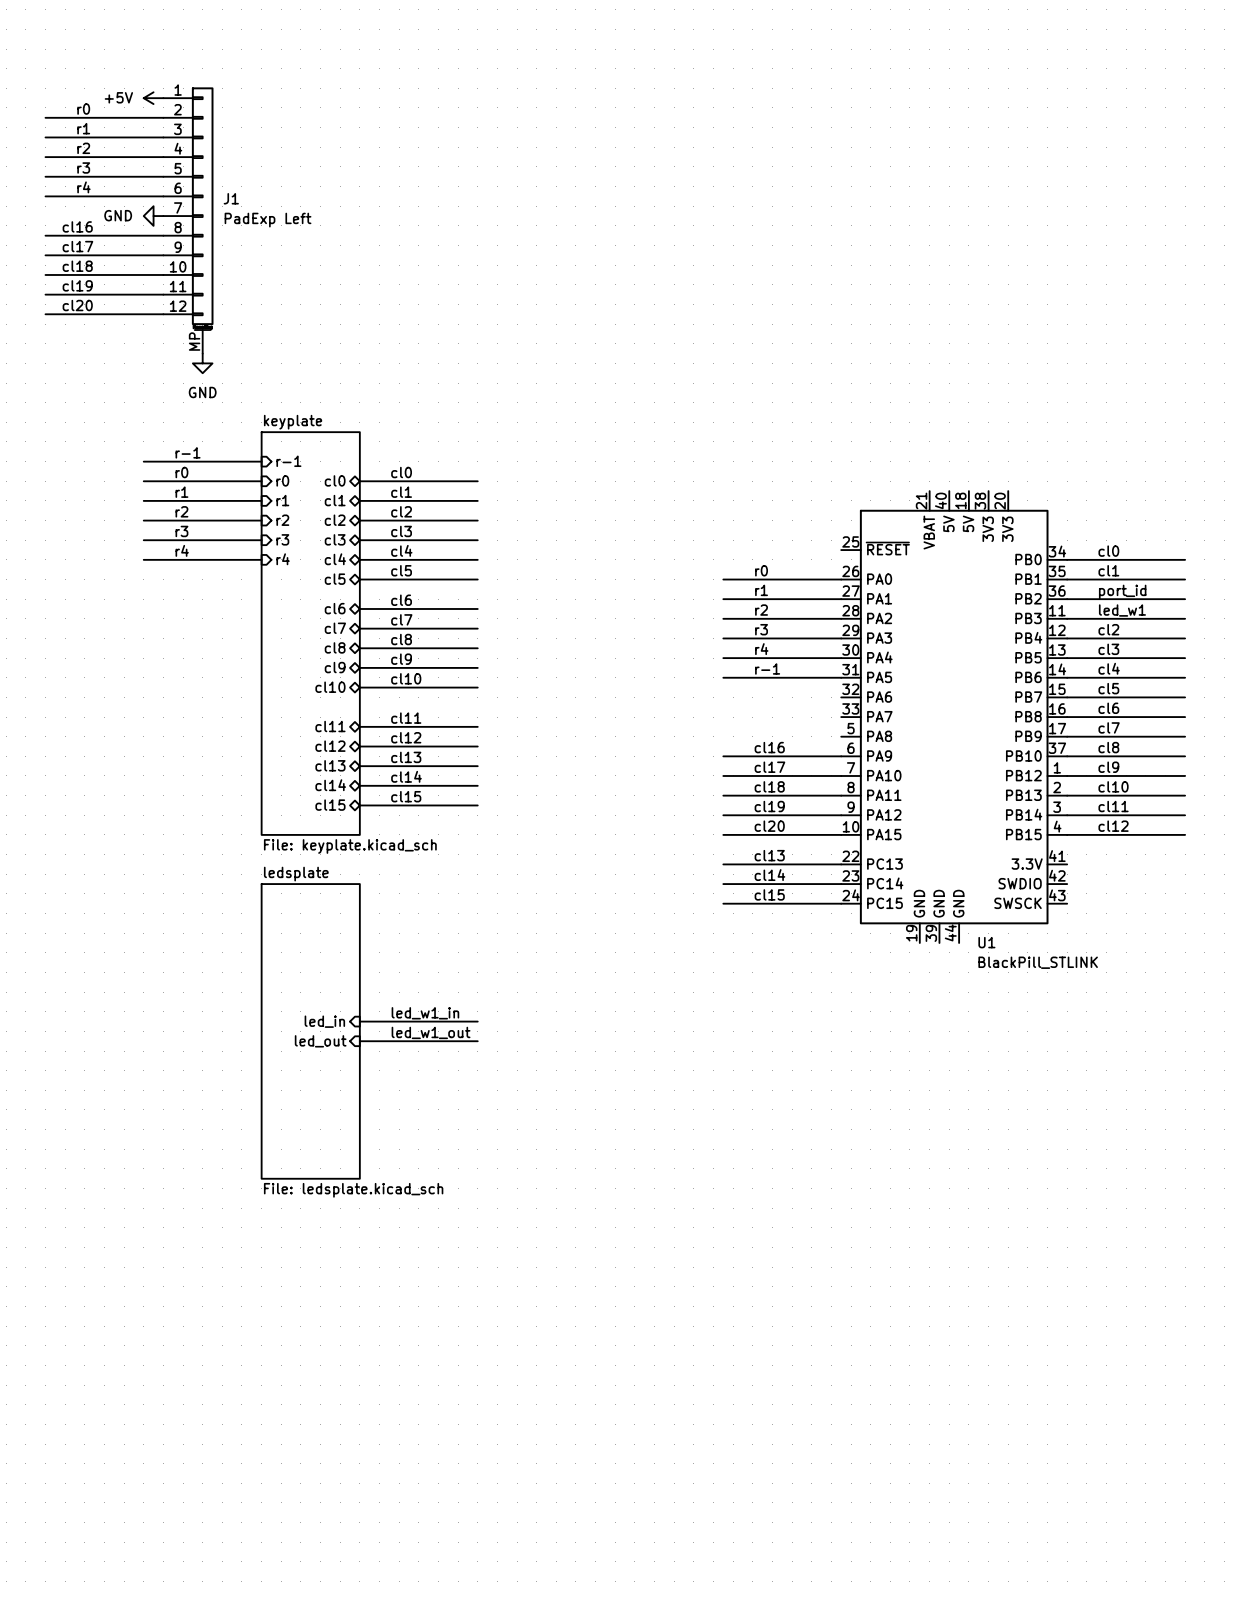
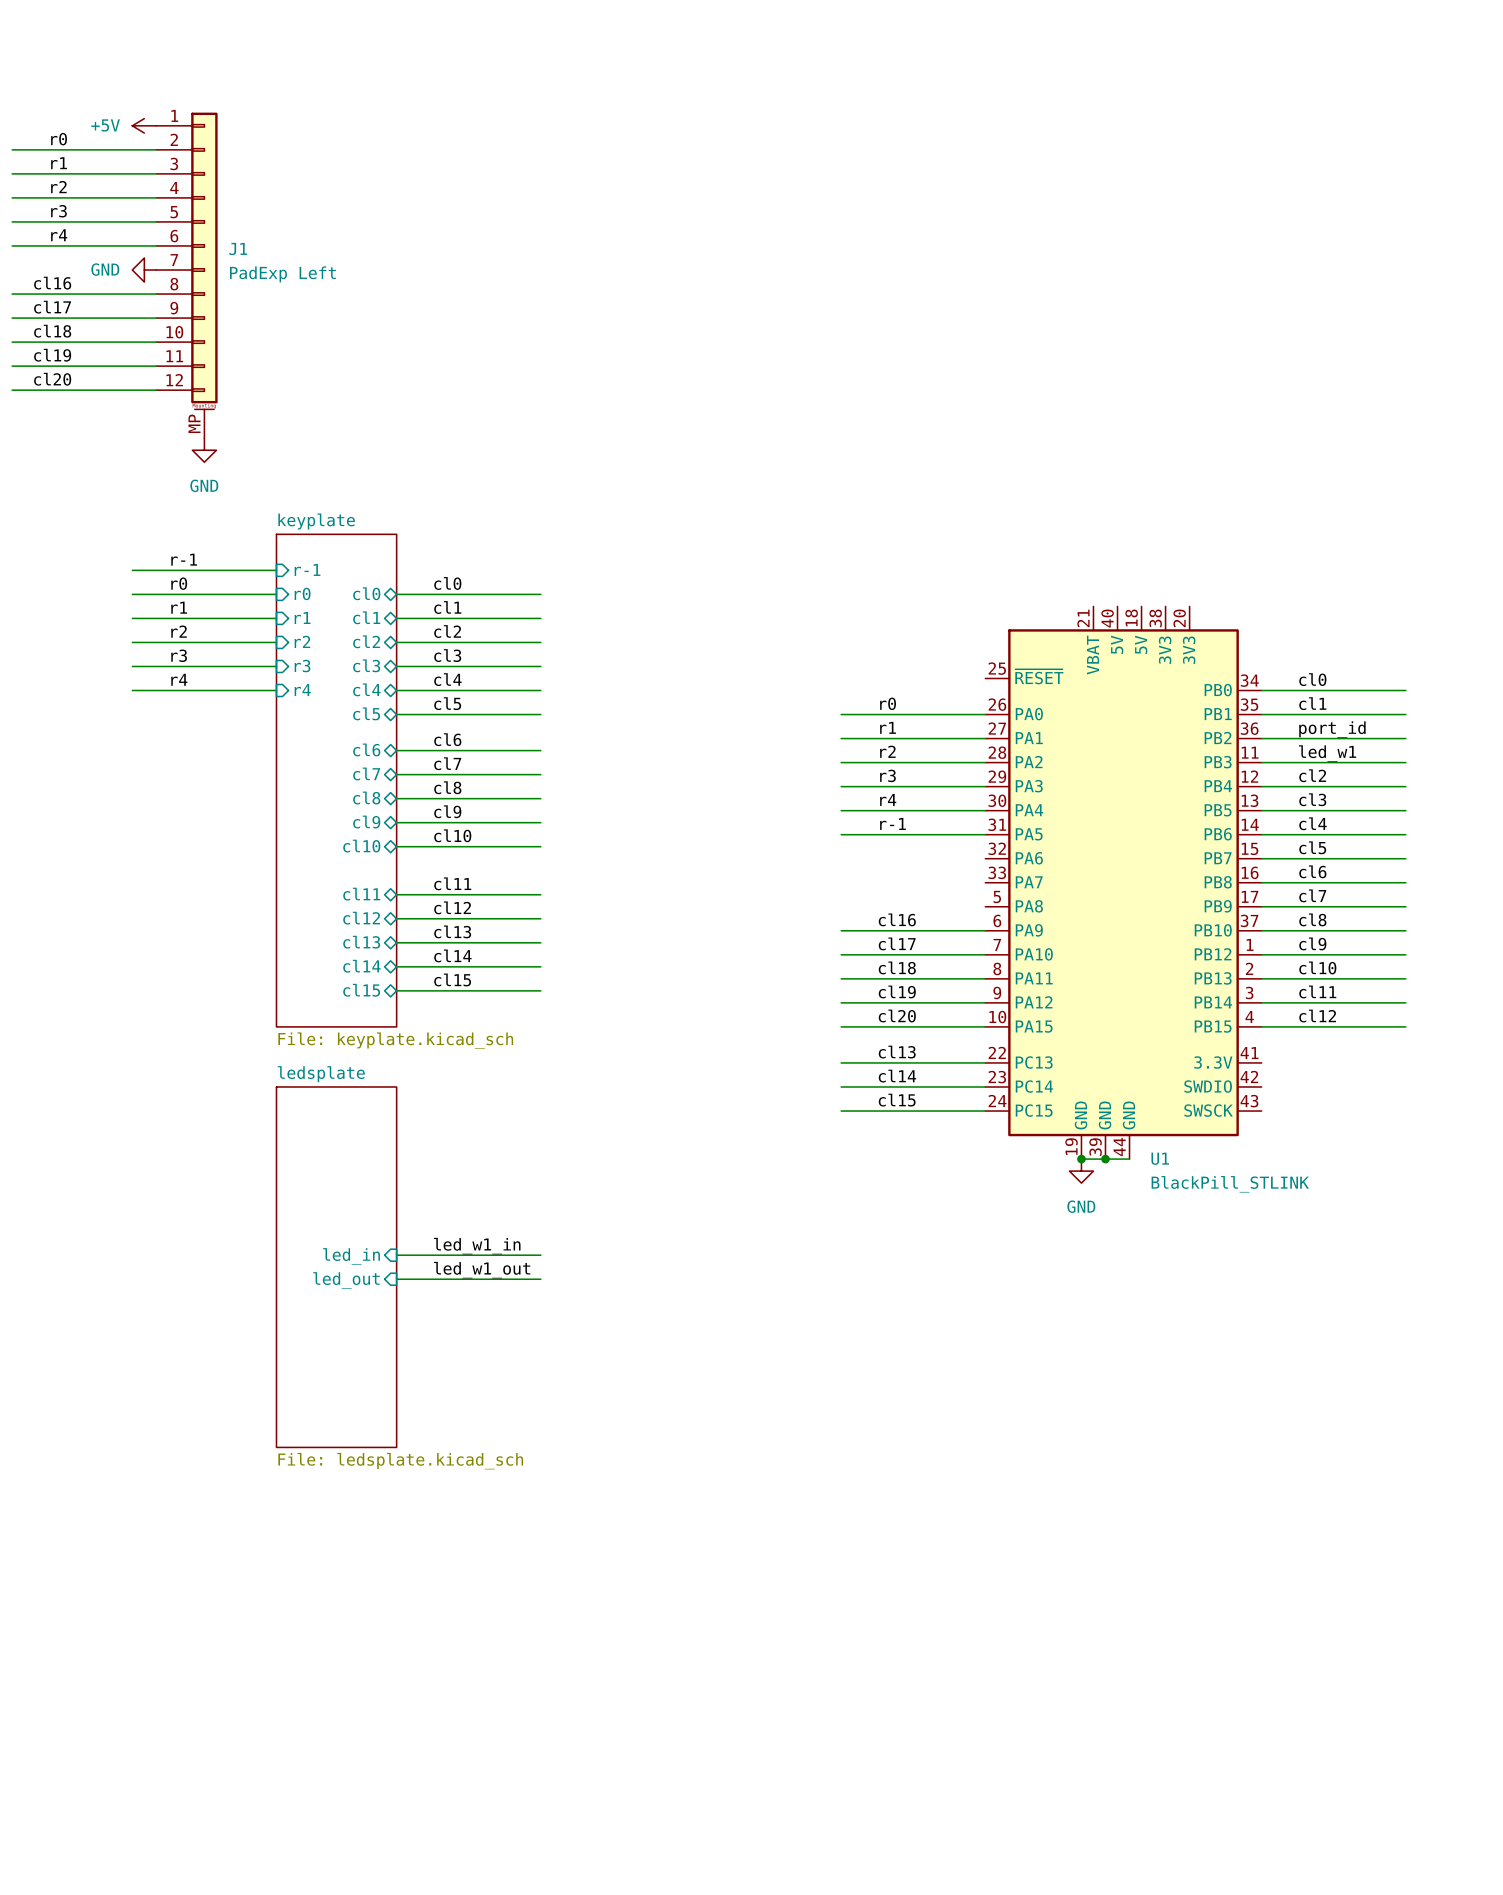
wire: none -> (1081, 1159) (1129, 1159)
junction: none -> (1081, 1159)
junction: none -> (1105, 1159)
power symbol: none -> GND (1081, 1171)

